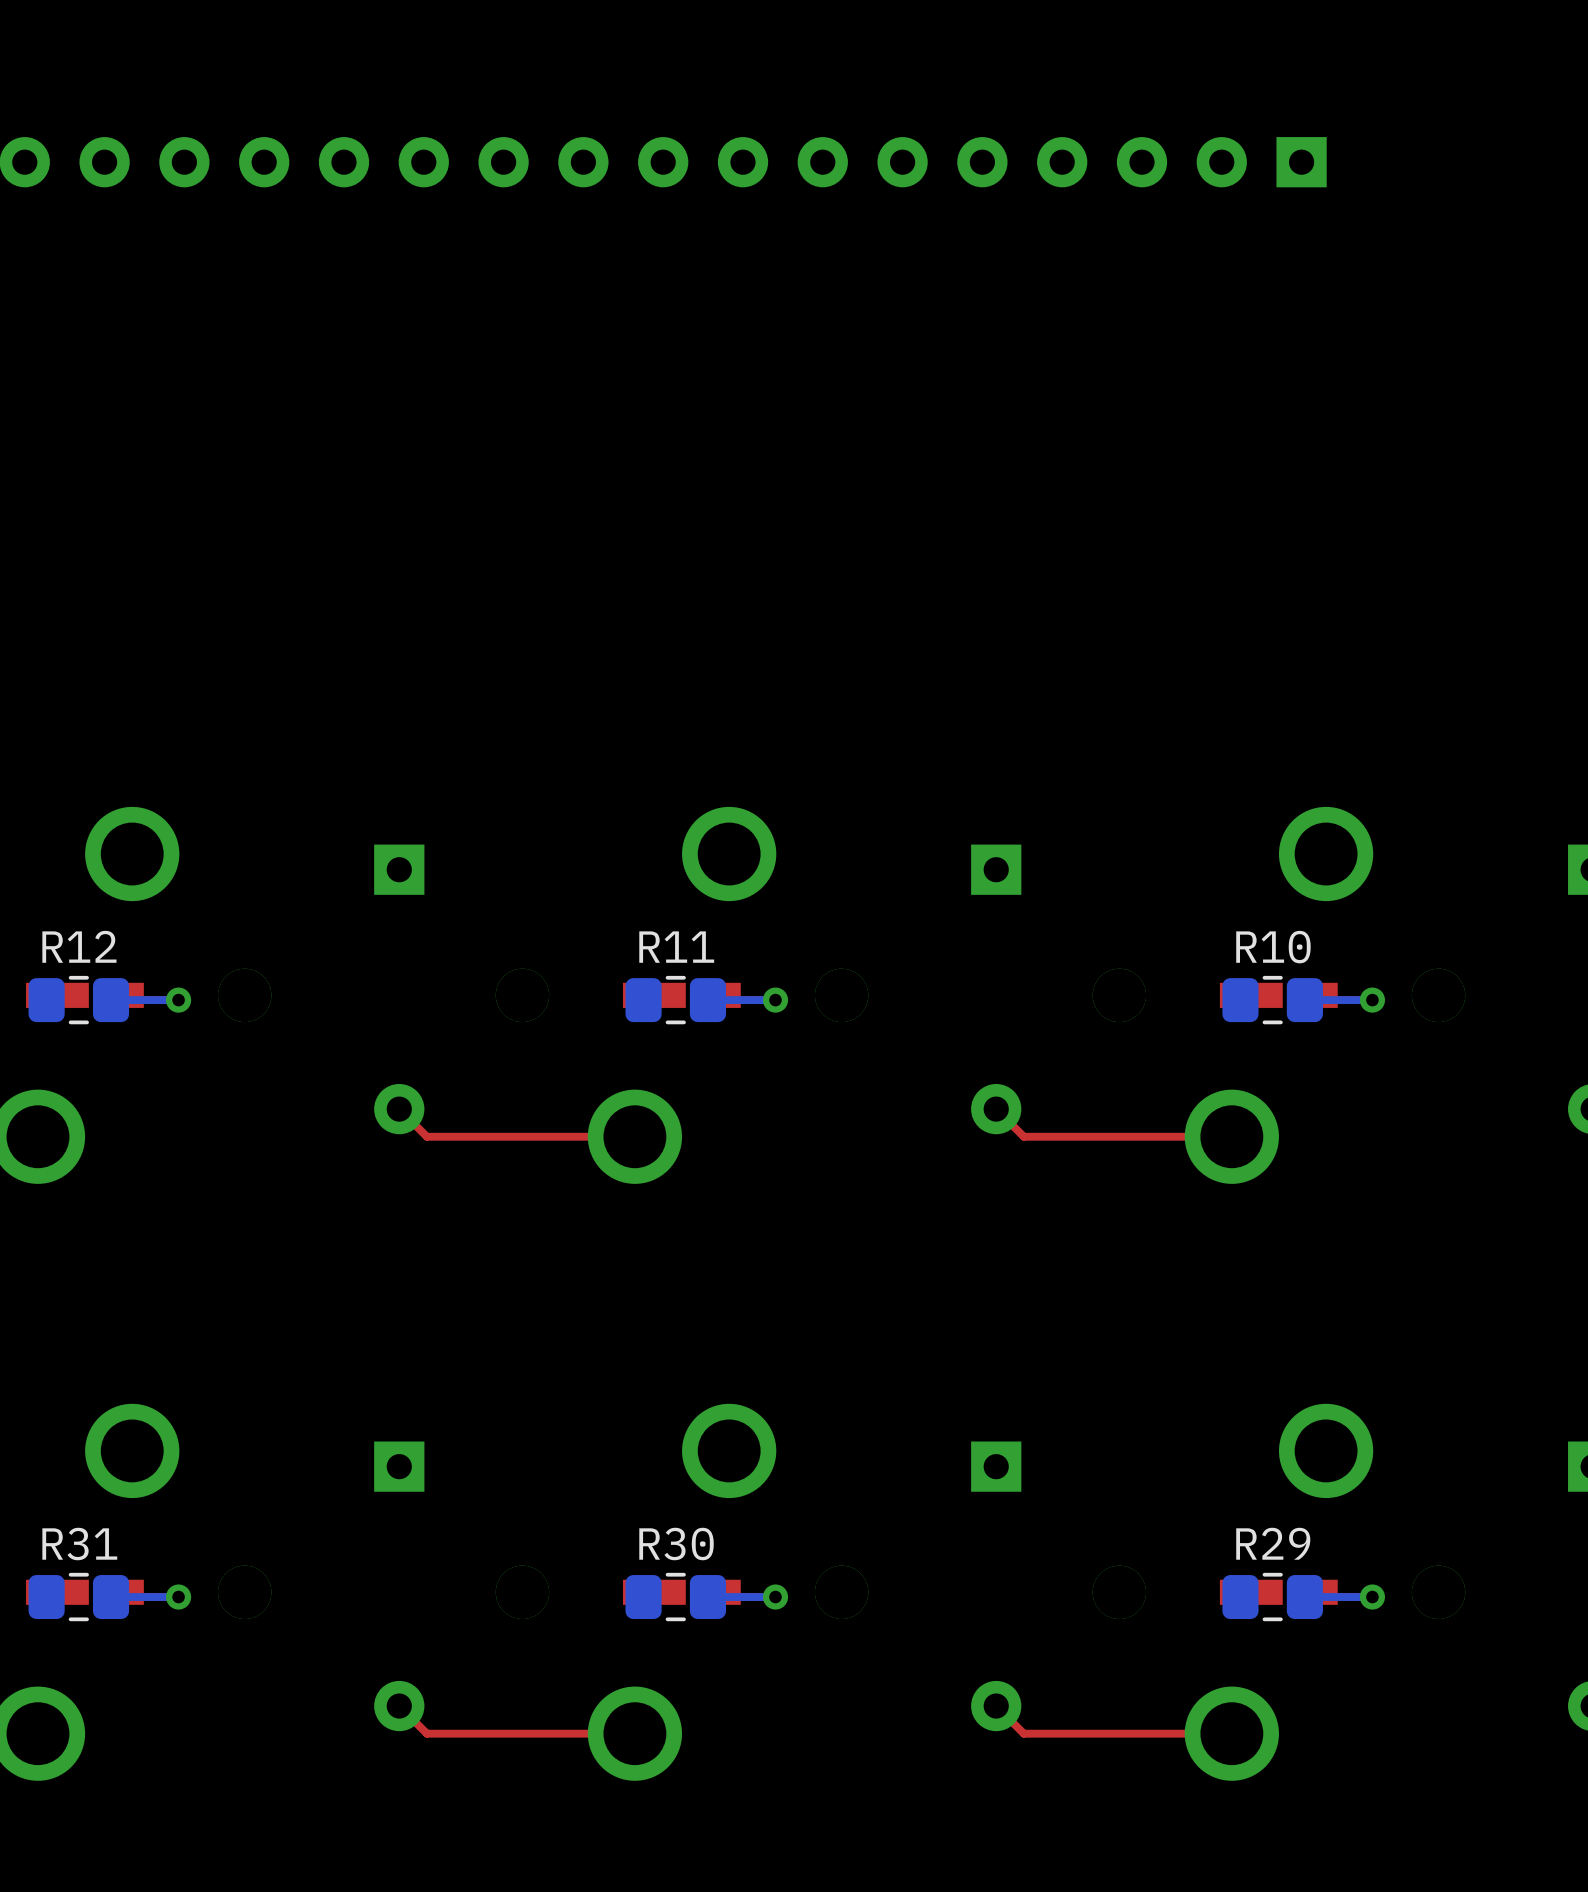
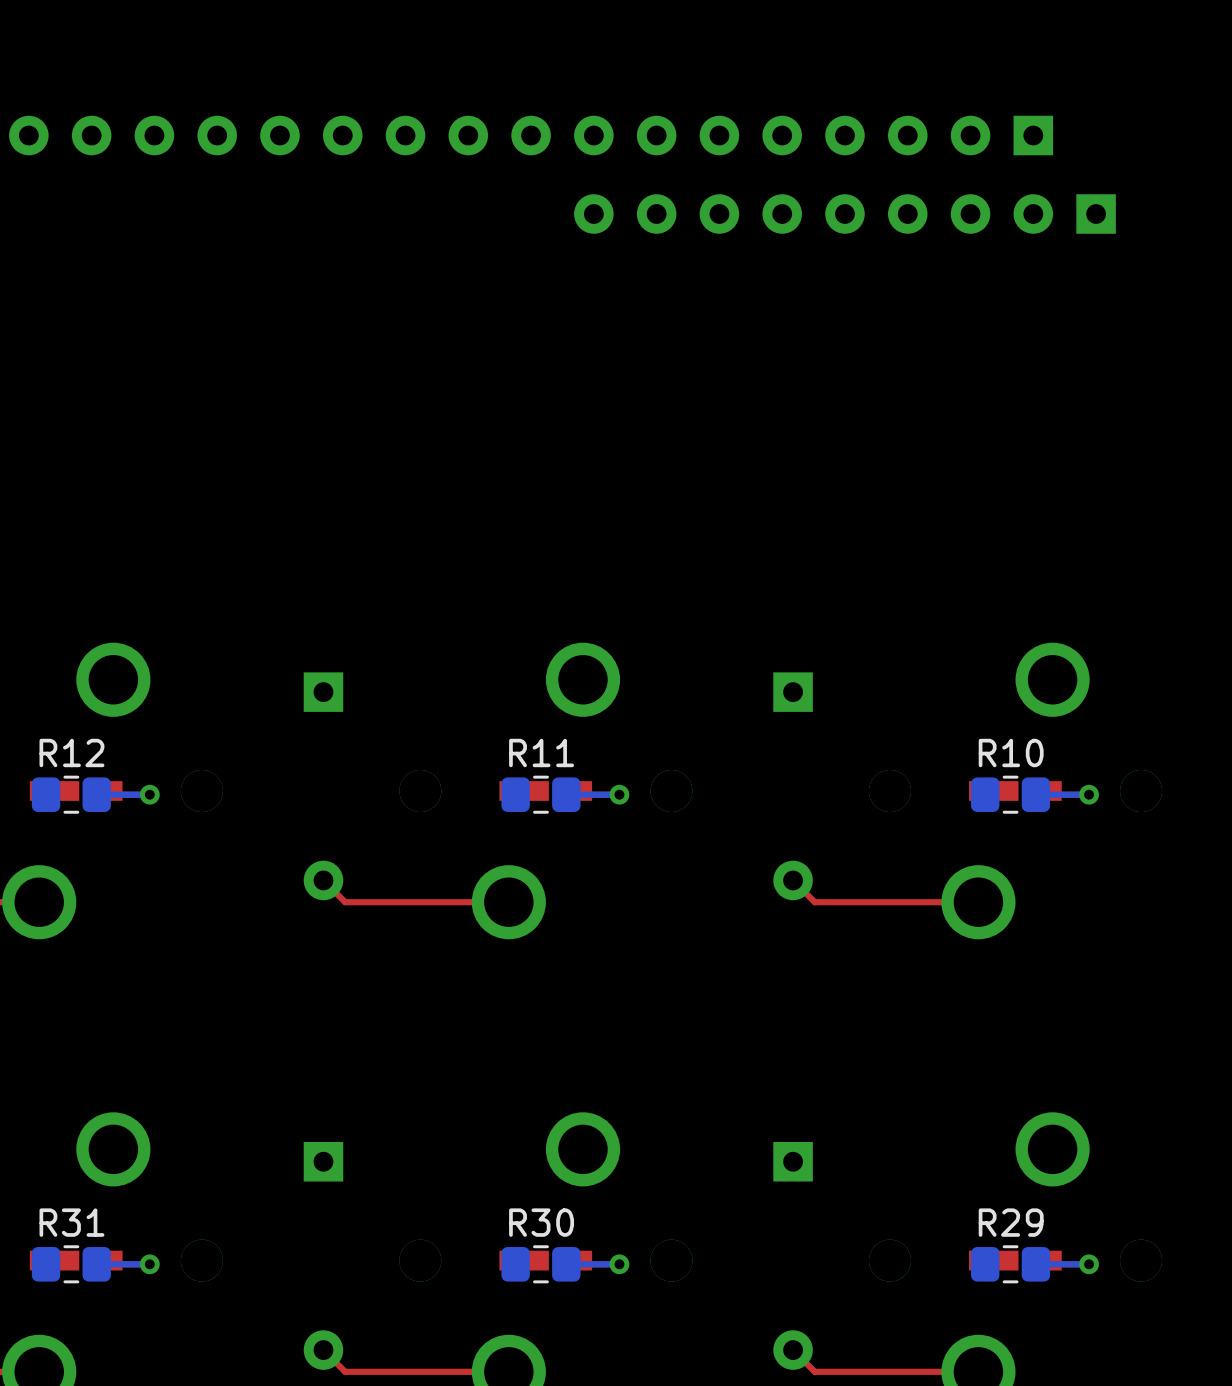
part: none -> (844, 213)

